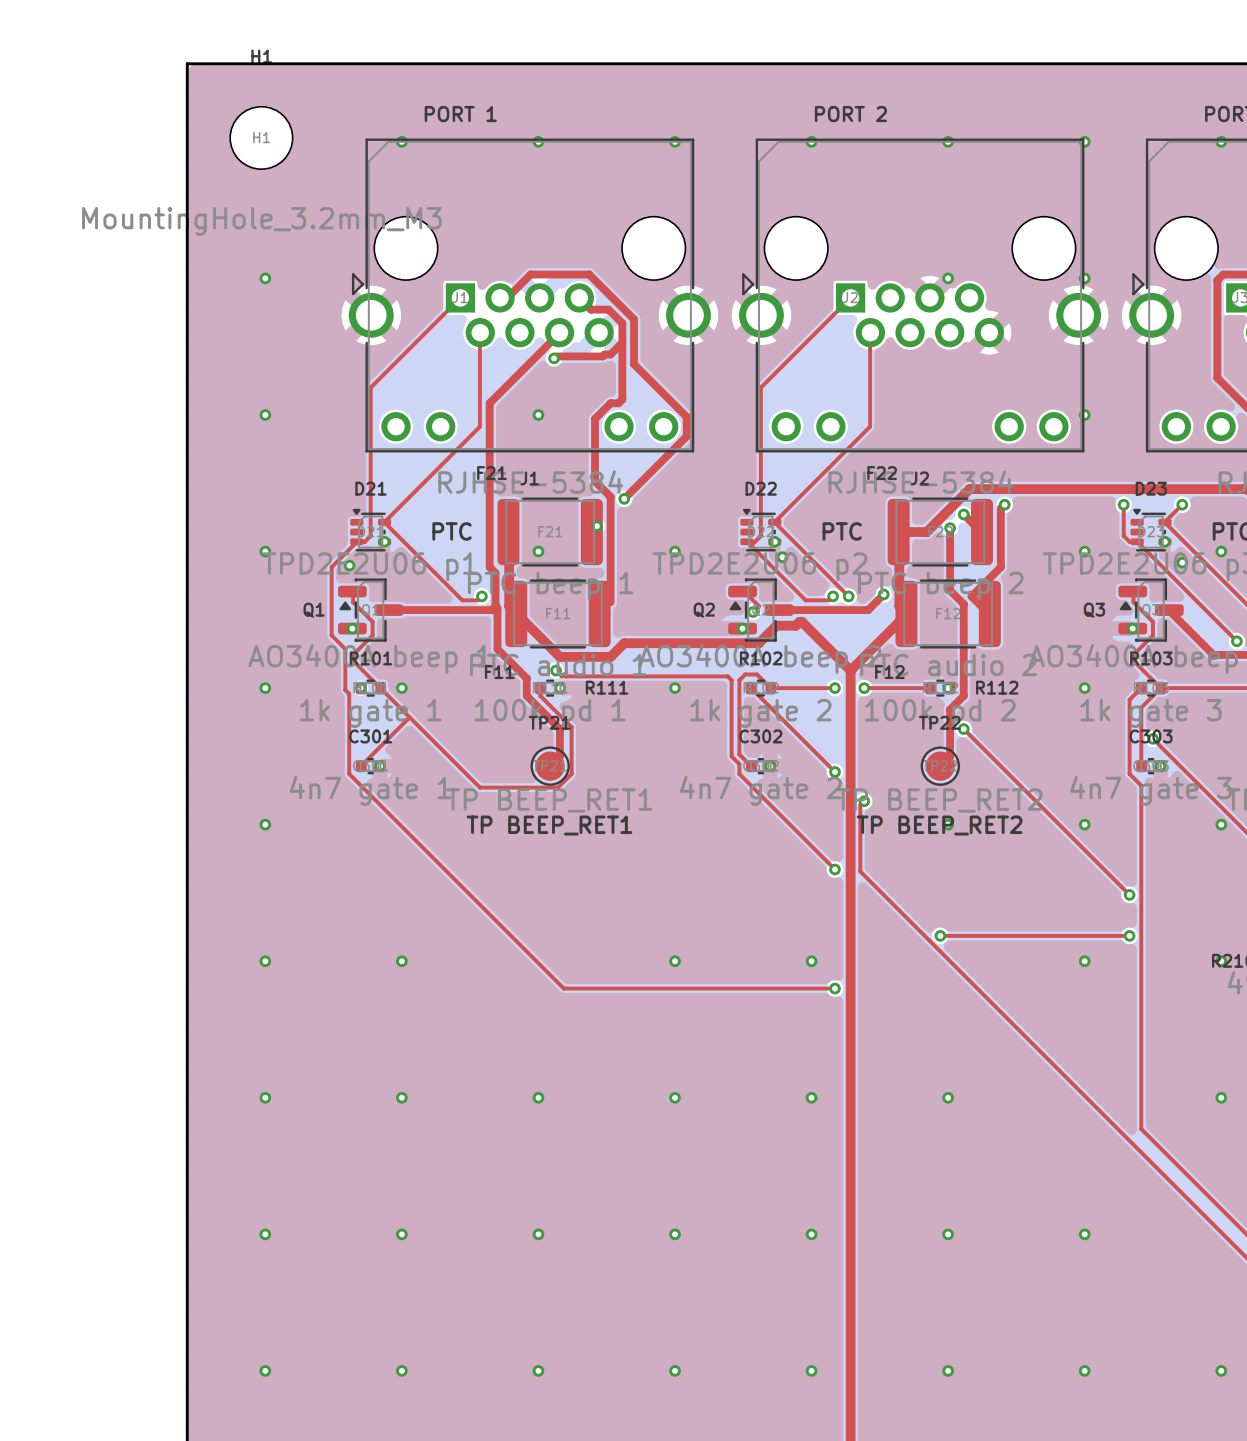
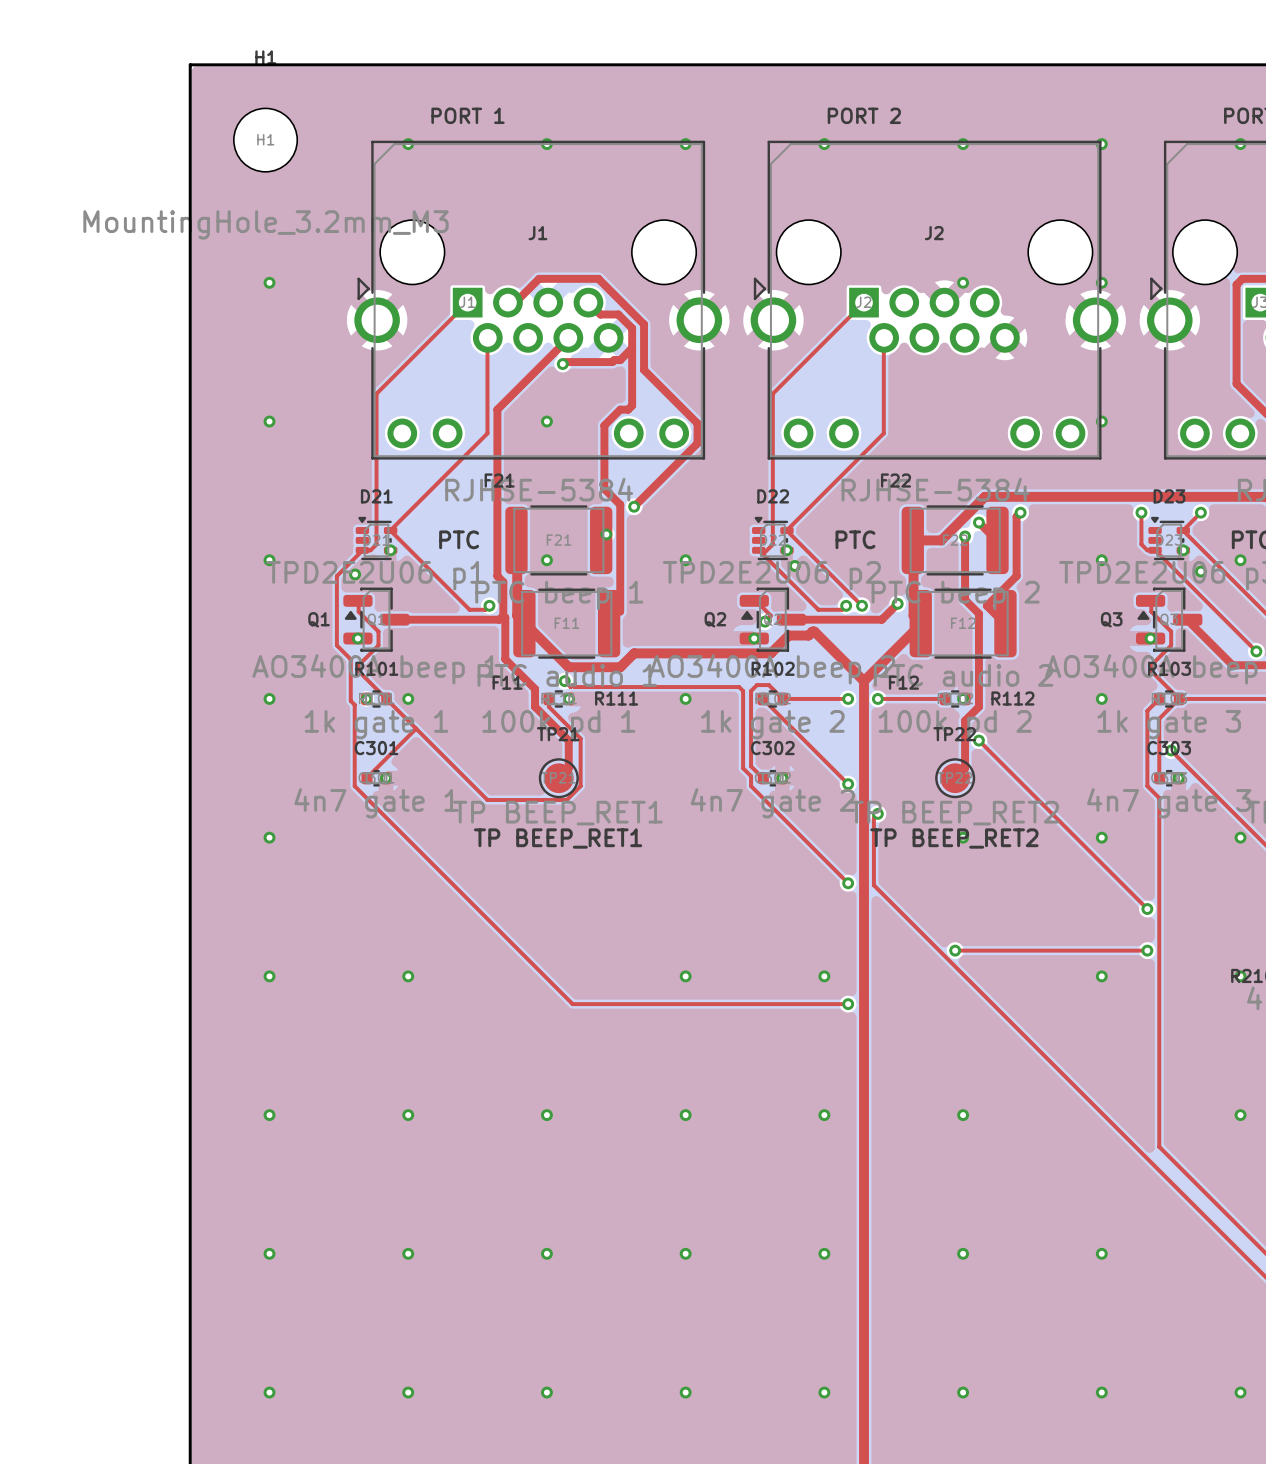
J1 name position: J1 (529, 478) -> J1 (537, 233)
J2 name position: J2 (919, 478) -> J2 (934, 233)

